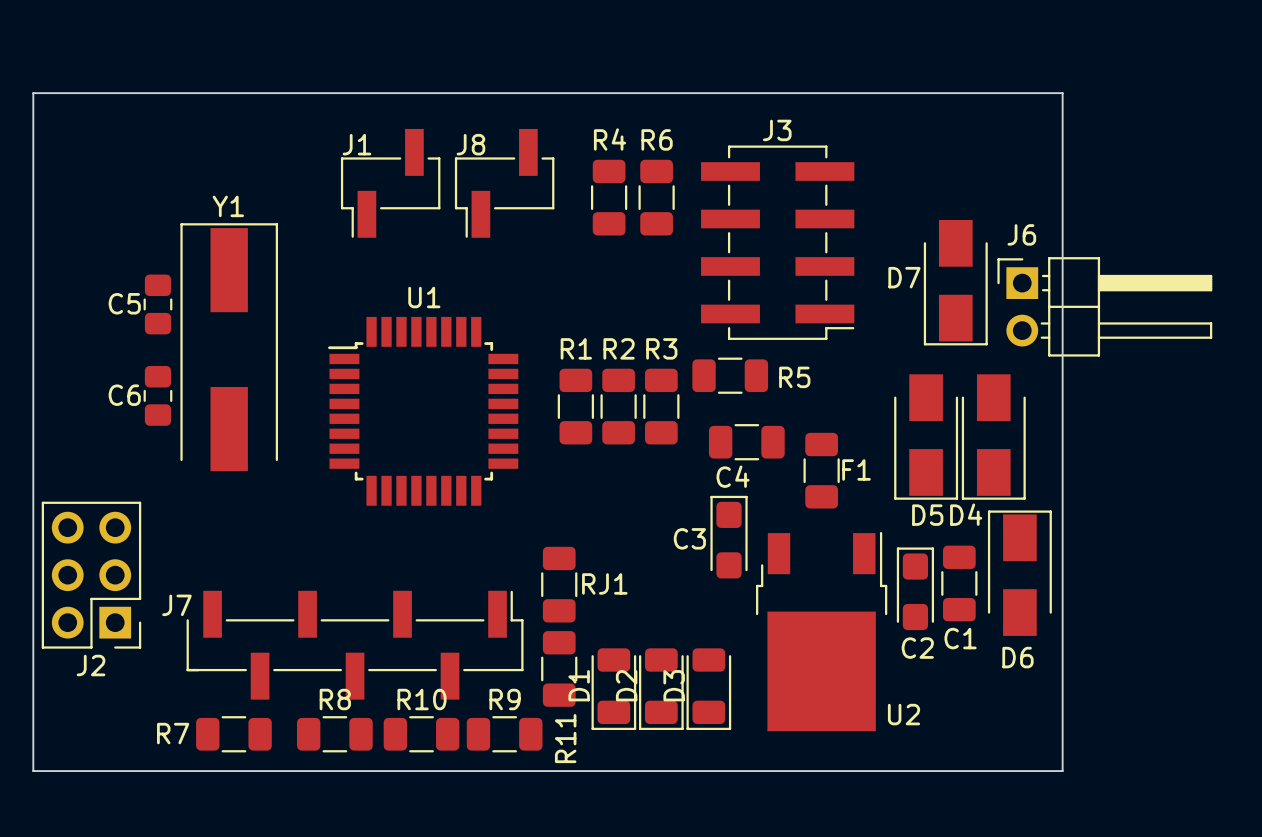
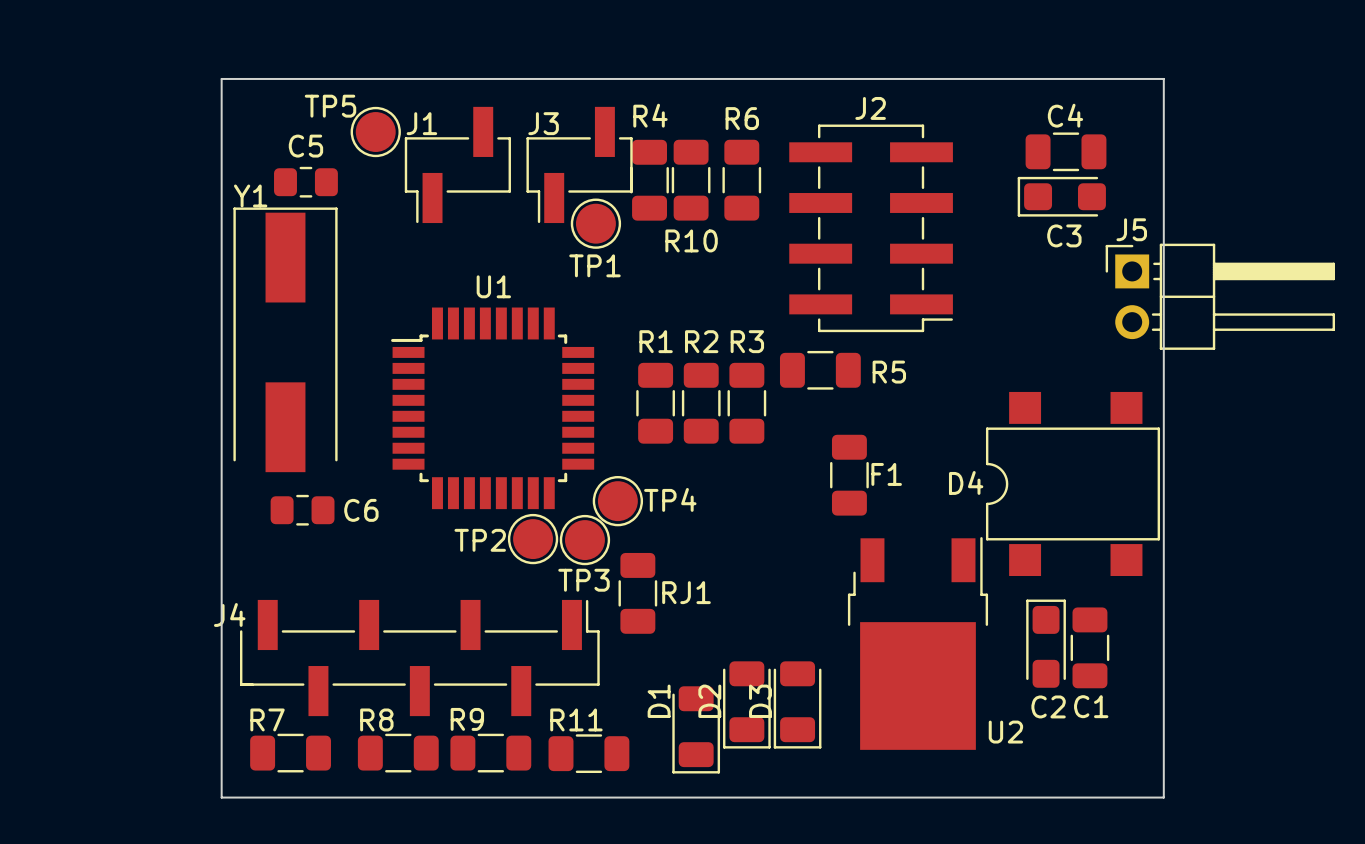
board edge: (33, 93) (33, 771) (1062, 771) (1062, 93) (33, 93) -> (221, 78) (221, 797) (1163, 797) (1163, 78) (221, 78)
J3 name: J3 (777, 130) -> J2 (870, 108)
R4 name: R4 (610, 139) -> R10 (691, 240)
J8 name: J8 (470, 144) -> J3 (543, 123)
TP5: none -> (375, 132)
R4: none -> (649, 180)
Y1 name position: Y1 (228, 206) -> Y1 (250, 195)
J6 name: J6 (1021, 234) -> J5 (1131, 229)
TP1: none -> (595, 223)
D7: (955, 282) -> none
C5 rotation: 0° (157, 304) -> 90° clockwise (305, 182)
C5 position: (157, 304) -> (305, 182)
D4 footprint: [961, 374, 1026, 500] -> [985, 391, 1161, 576]
C6 name position: C6 (124, 395) -> C6 (361, 510)
C6 rotation: 0° (157, 395) -> 90° clockwise (302, 510)
C6 position: (157, 395) -> (302, 510)
D5: (926, 437) -> none
C4 position: (746, 442) -> (1066, 151)
F1 position: (821, 470) -> (849, 475)
C4 name position: C4 (733, 476) -> C4 (1065, 115)
TP4: none -> (617, 501)
D4 name position: D4 (966, 514) -> D4 (966, 482)
TP2: none -> (533, 539)
TP3: none -> (584, 540)
C3 rotation: 0° (729, 537) -> 90° counterclockwise (1061, 196)
C3 position: (729, 537) -> (1061, 196)
D6: (1019, 573) -> none
J2: (91, 575) -> none
C1 position: (959, 583) -> (1089, 647)
C2 position: (915, 588) -> (1046, 643)
J7 name: J7 (176, 605) -> J4 (229, 614)
R11 rotation: 0° (559, 668) -> 90° clockwise (588, 753)
R11 position: (559, 668) -> (588, 753)
D1 position: (613, 689) -> (696, 729)
R8 name position: R8 (335, 699) -> R8 (376, 719)
R10 name: R10 (421, 699) -> R9 (467, 719)
R7 name position: R7 (173, 733) -> R7 (267, 719)
R9: (504, 734) -> none
R11 name position: R11 (565, 738) -> R11 (576, 719)

